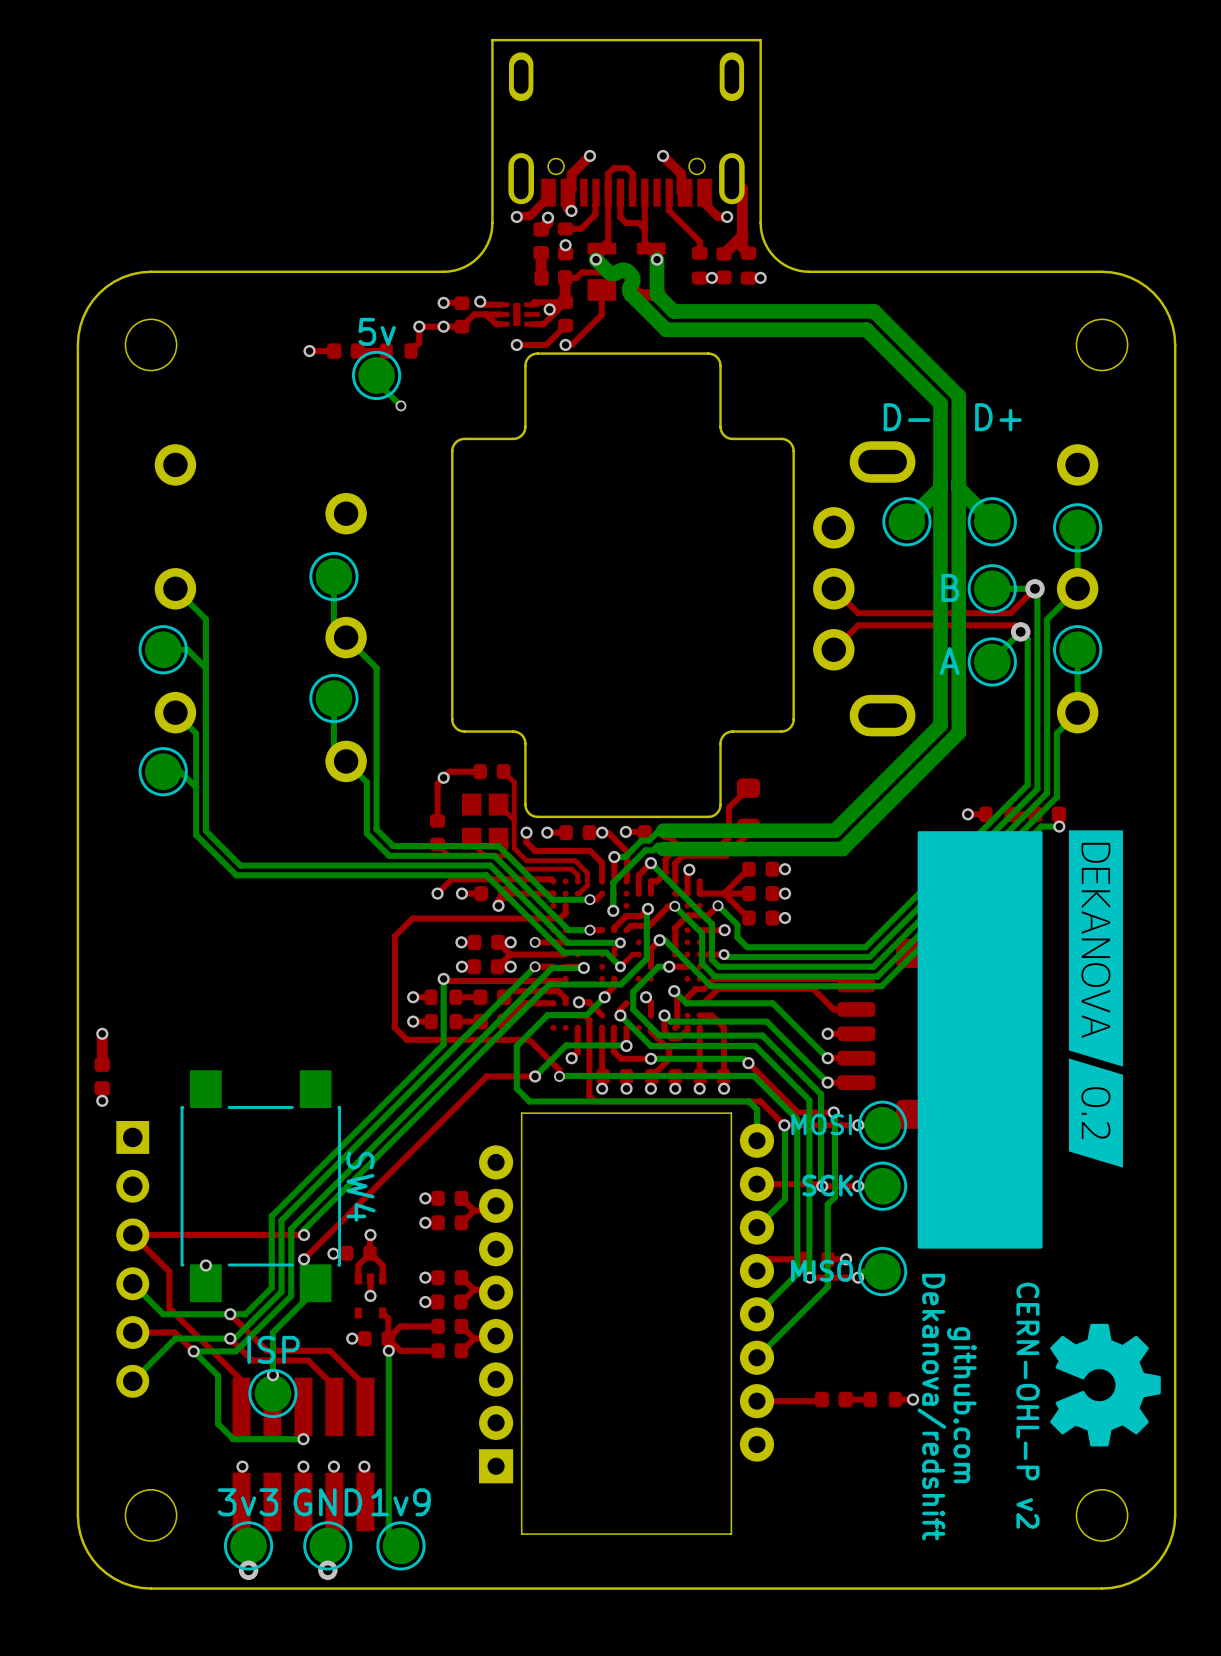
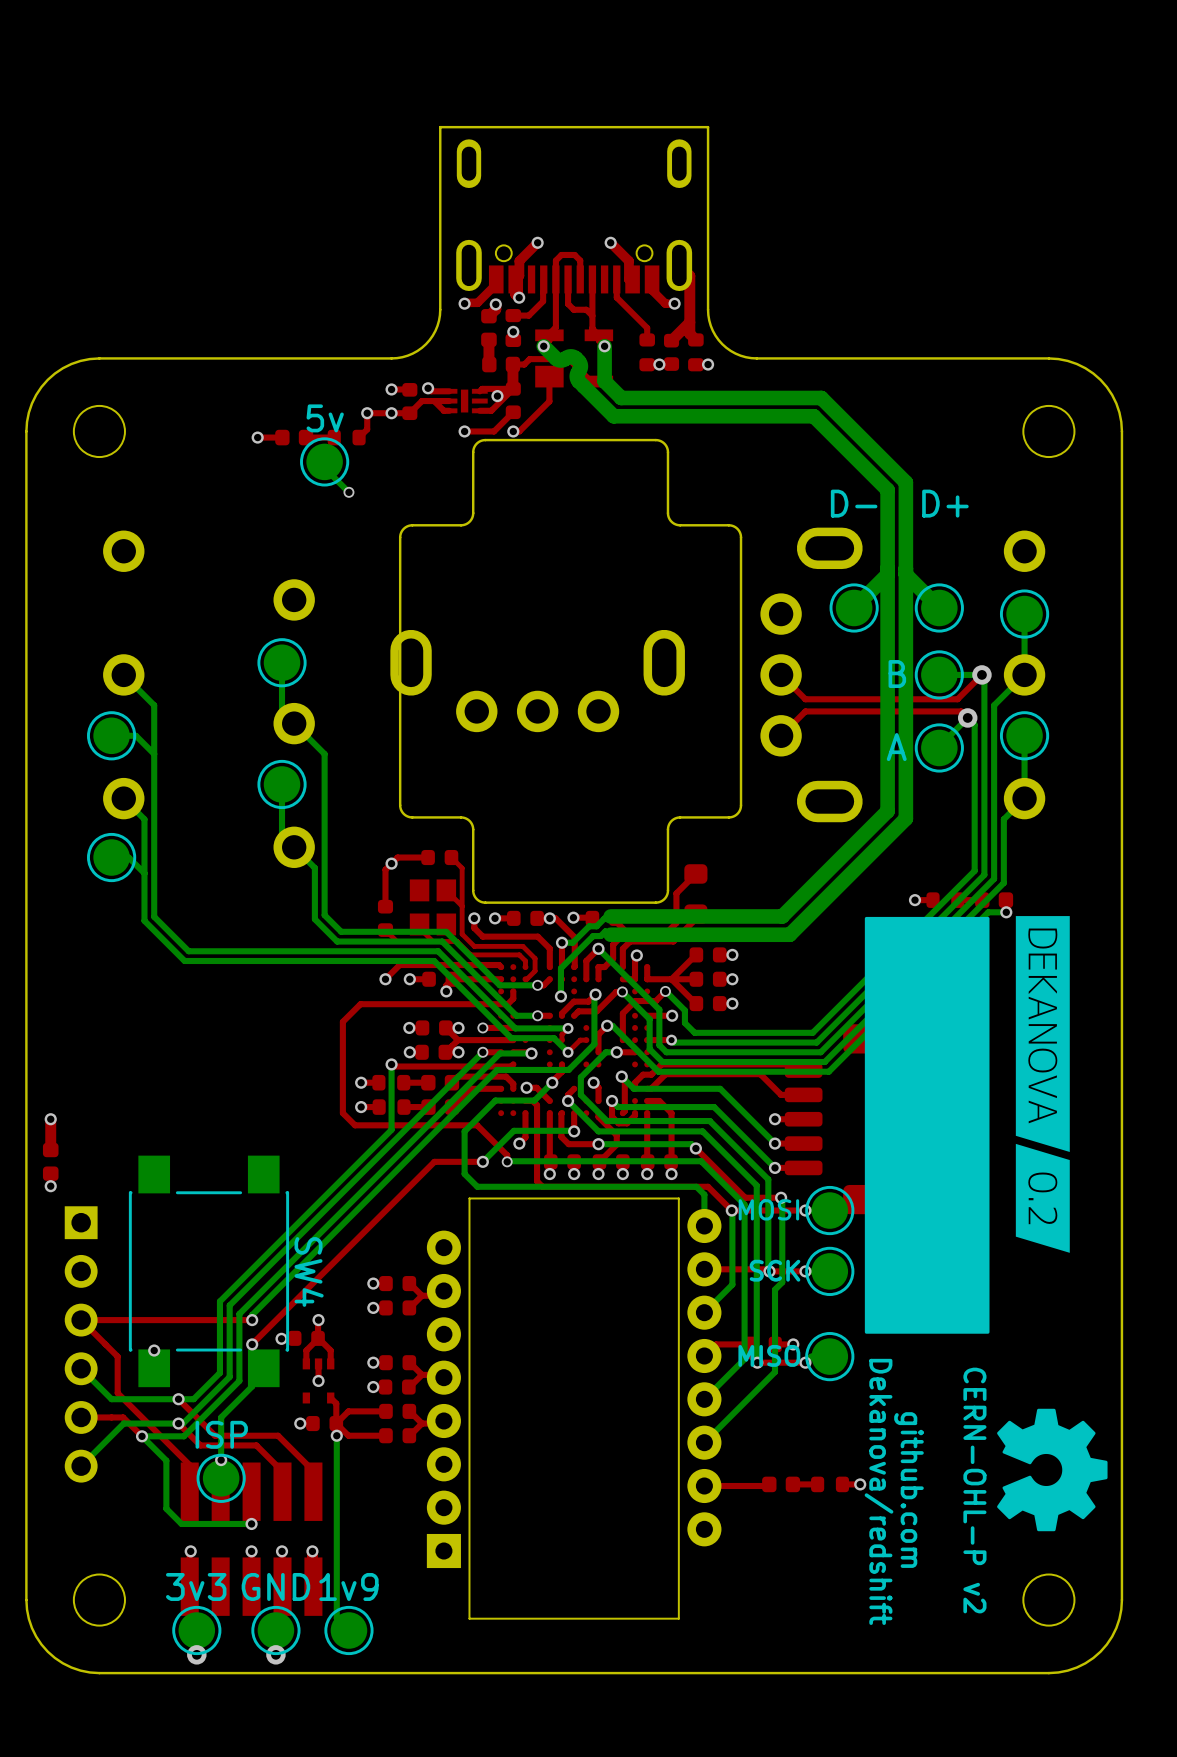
part: none -> (537, 681)

